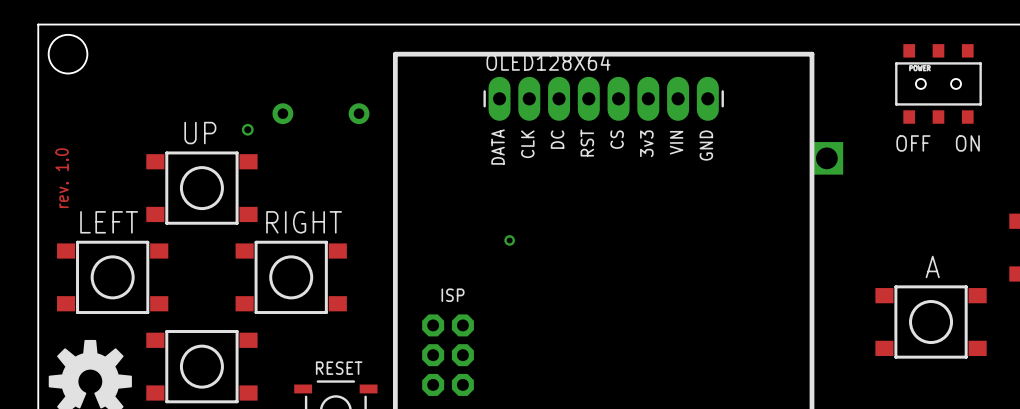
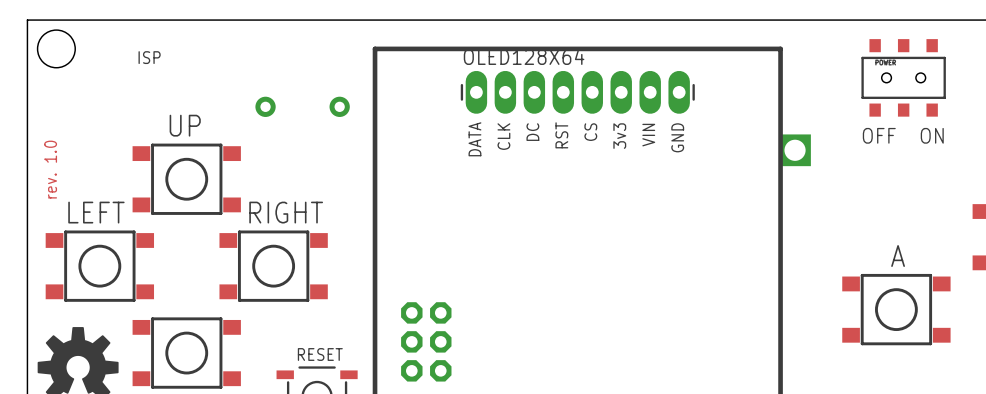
text: none -> ISP (149, 57)
via: (247, 129) -> none
via: (509, 240) -> none
text: ISP (453, 295) -> none

